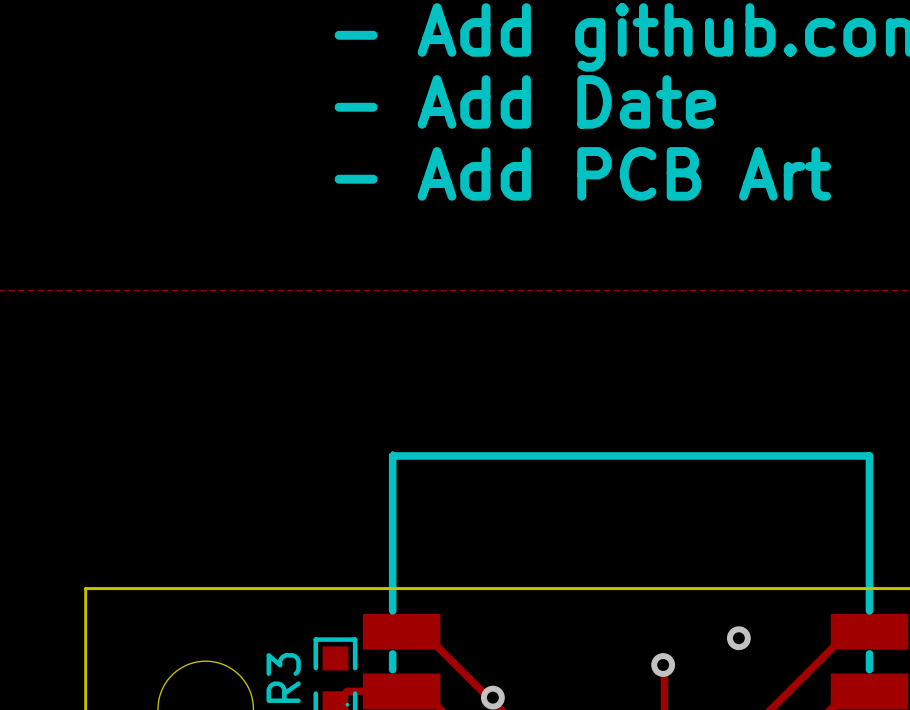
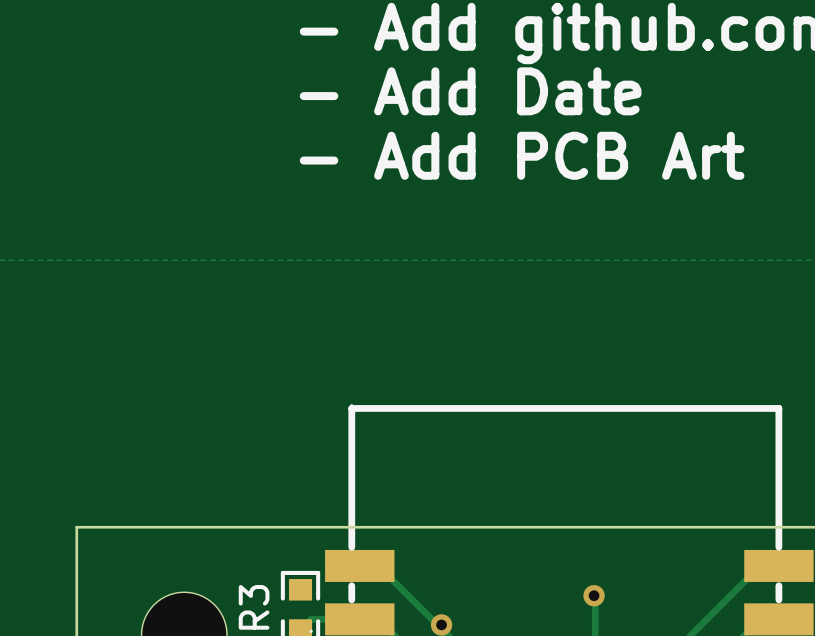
via: (738, 638) -> none

